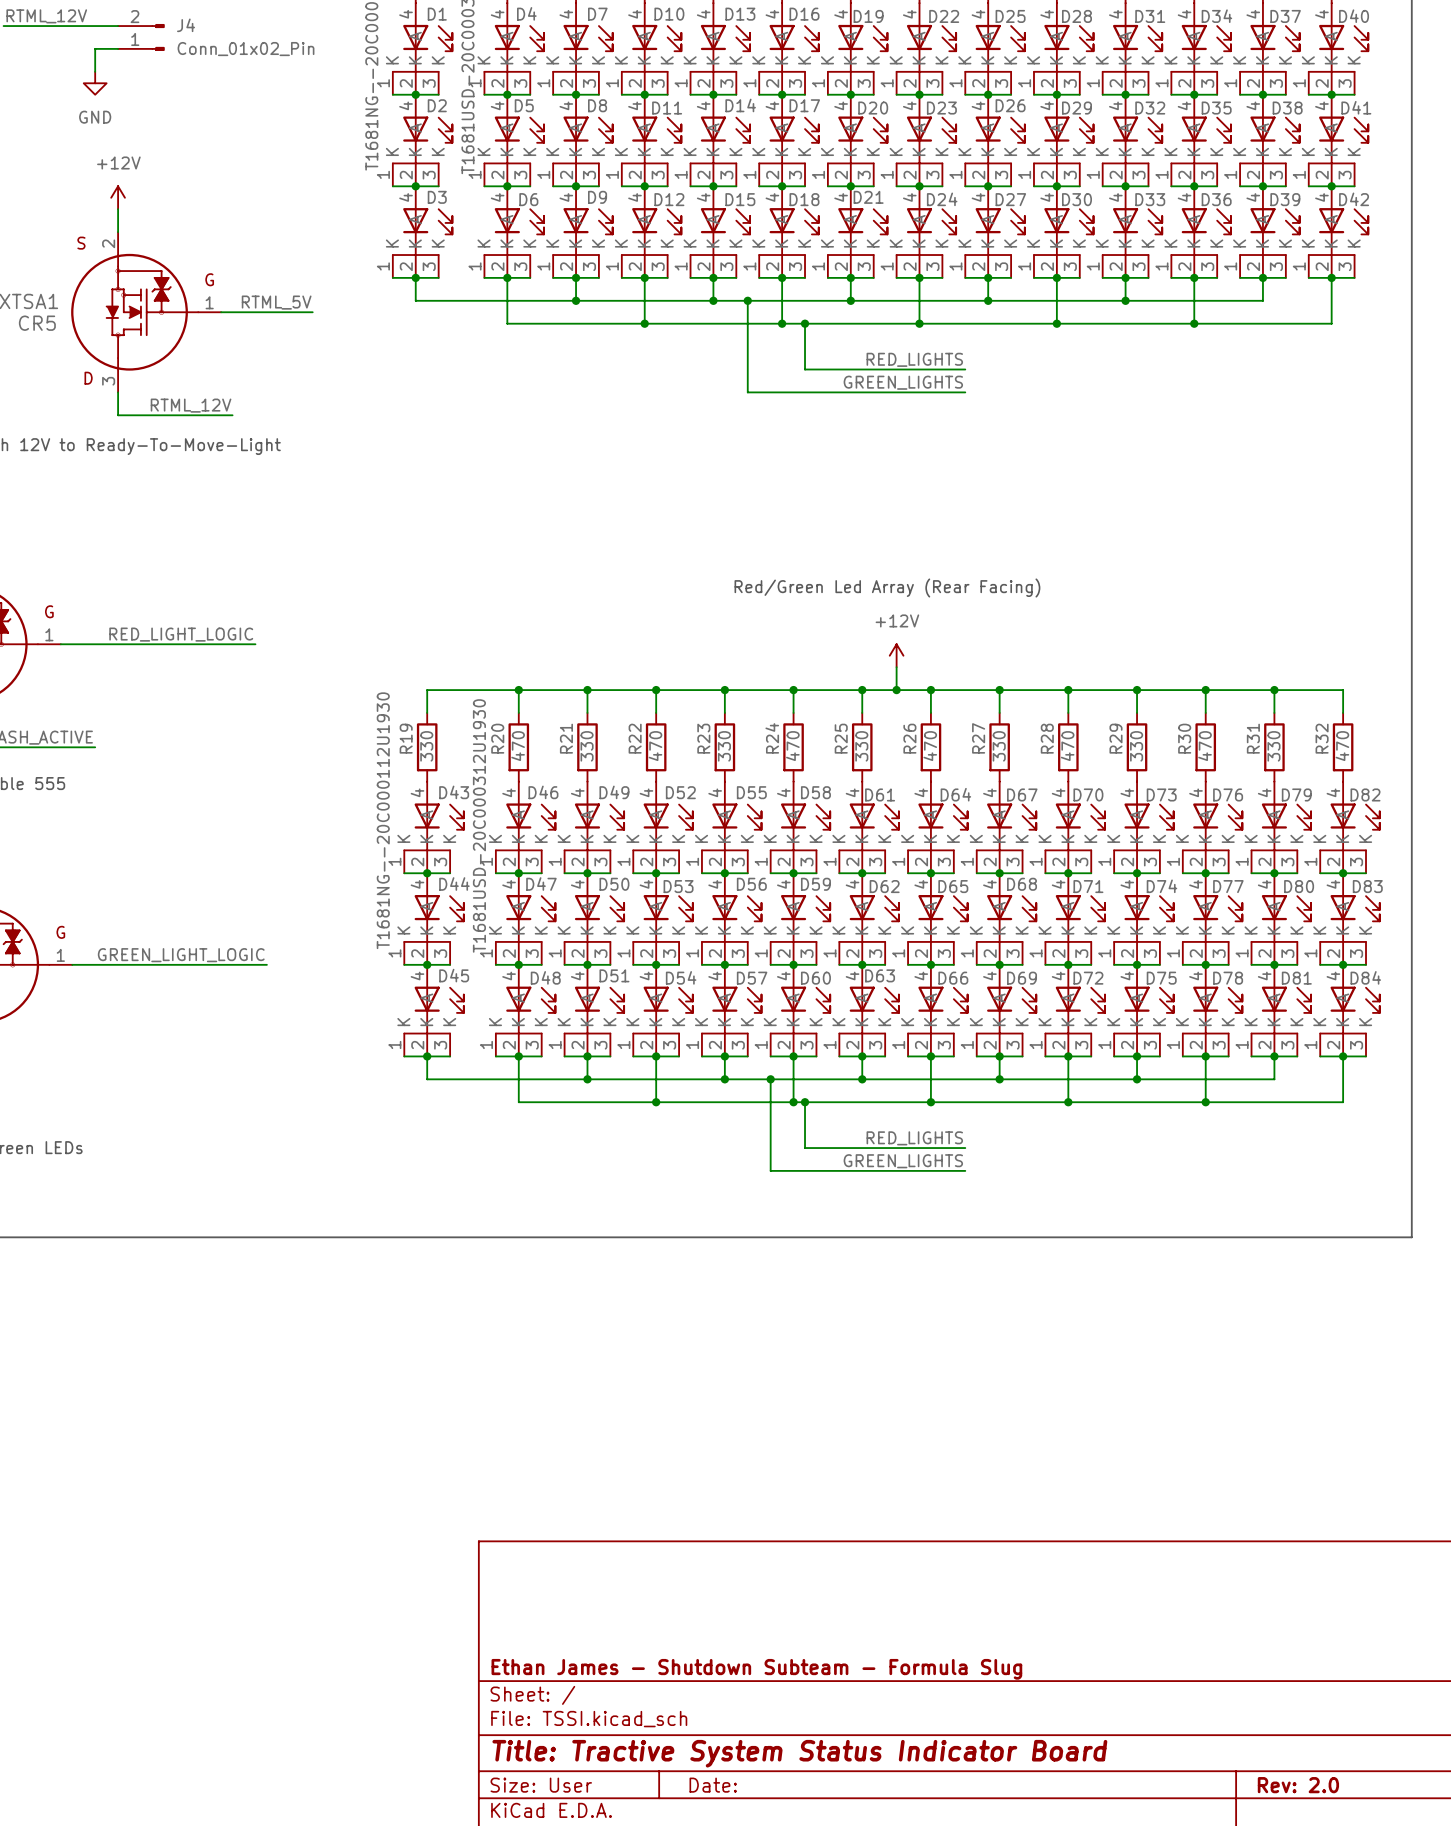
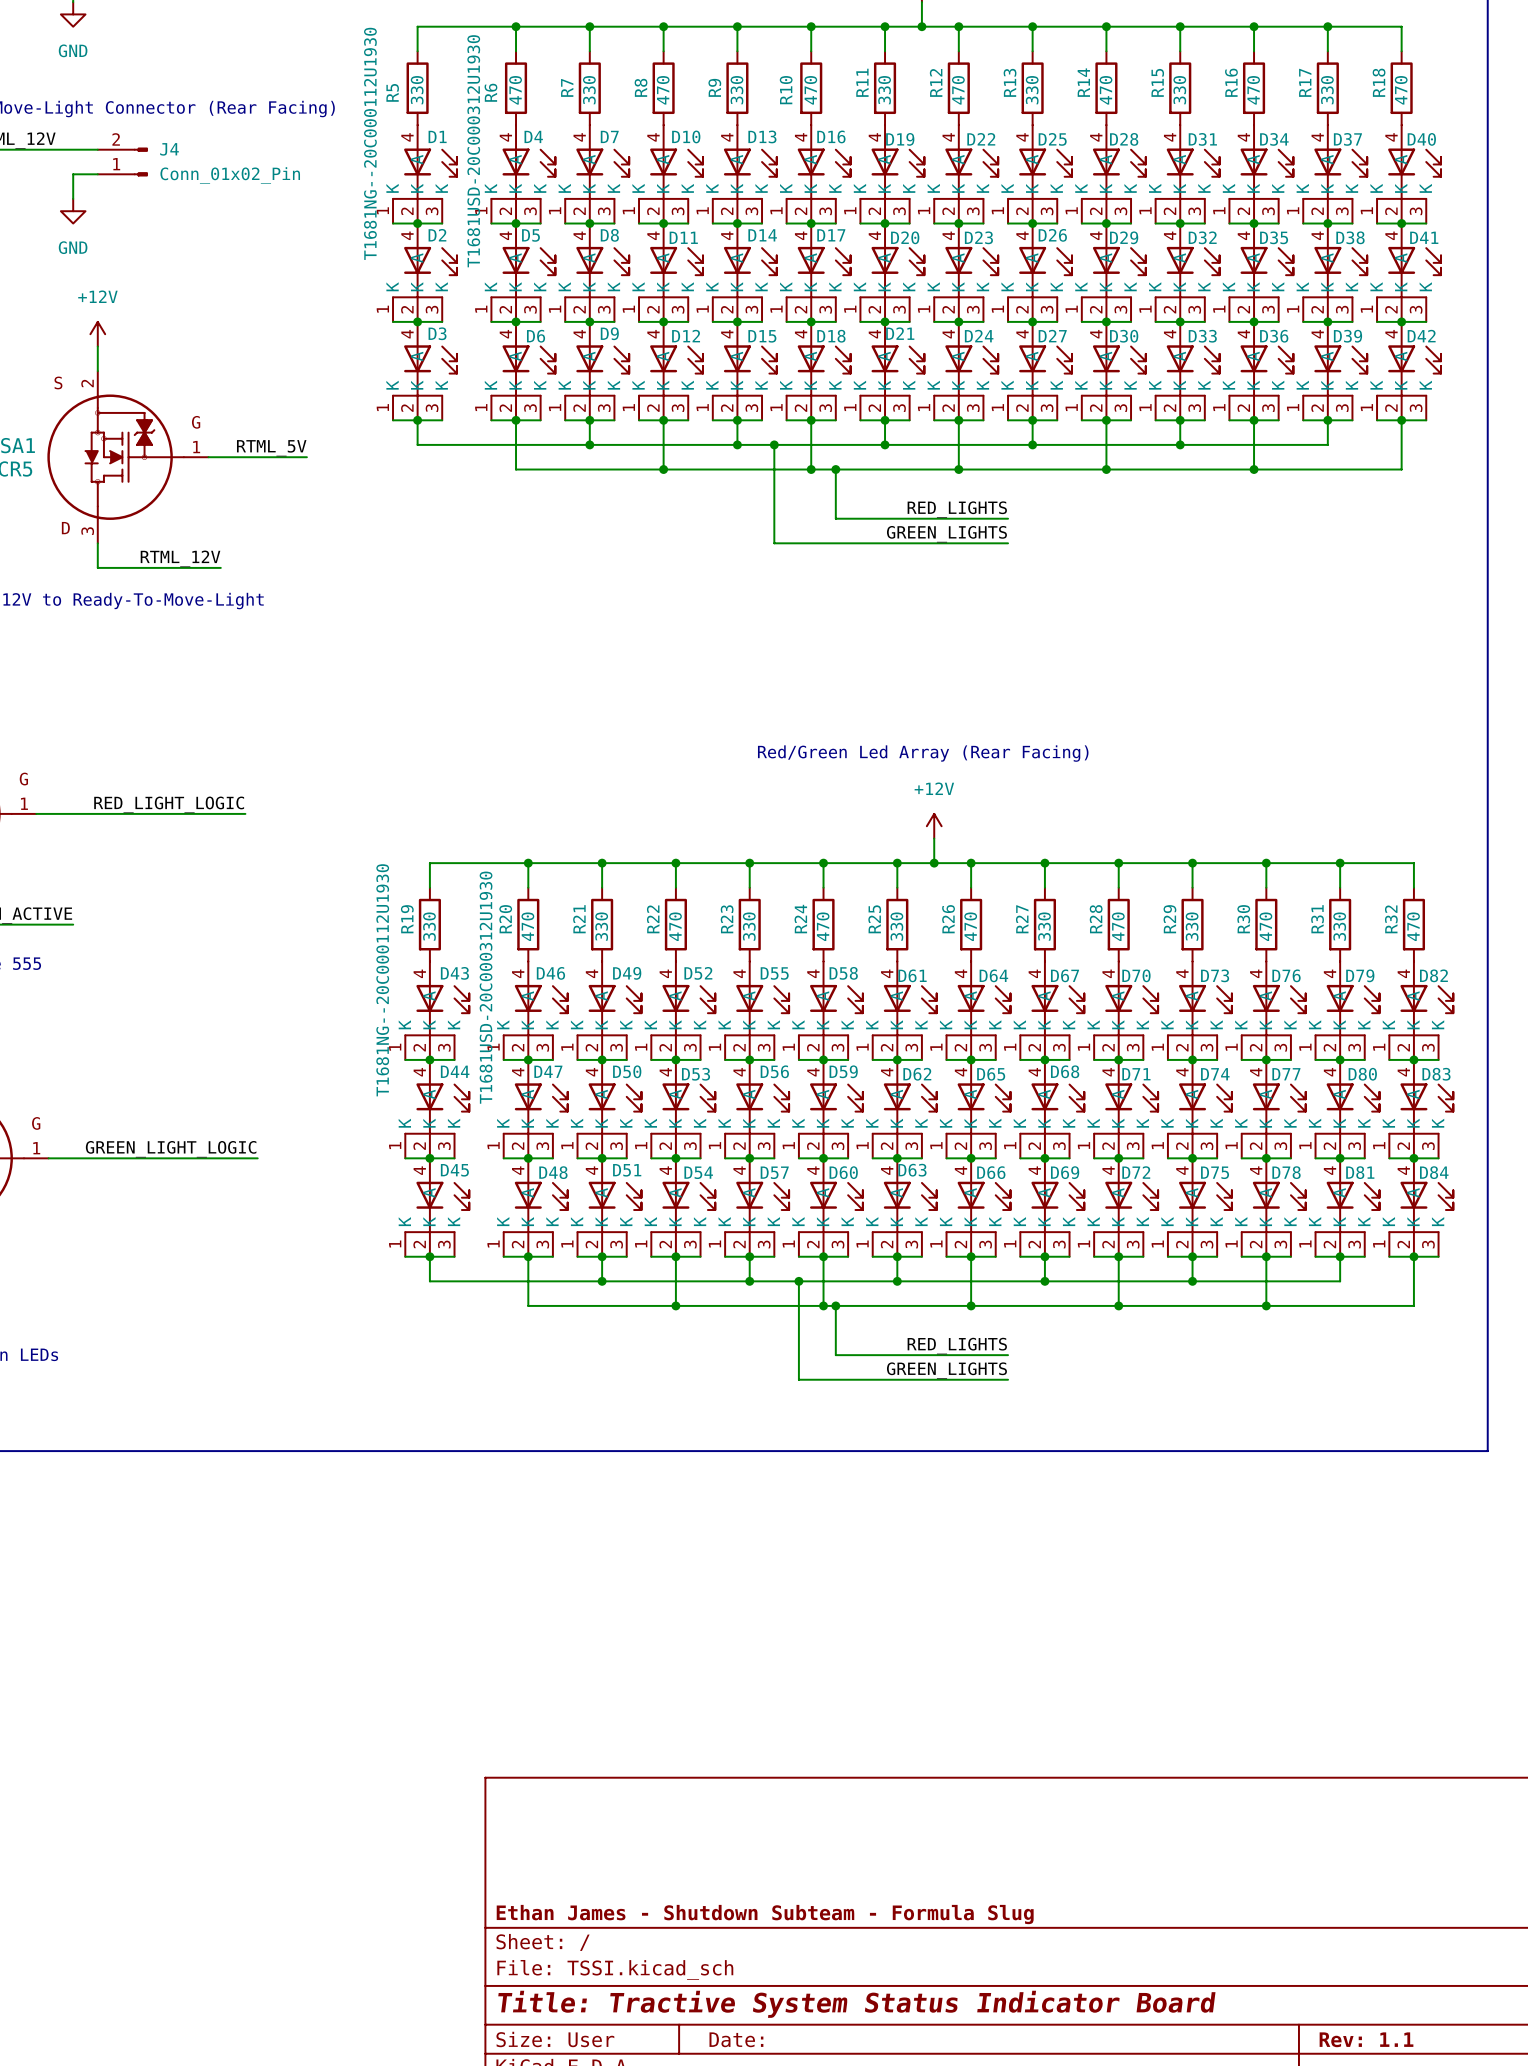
title block: Rev: 2.0 (1298, 1785) -> Rev: 1.1 (1366, 2039)

